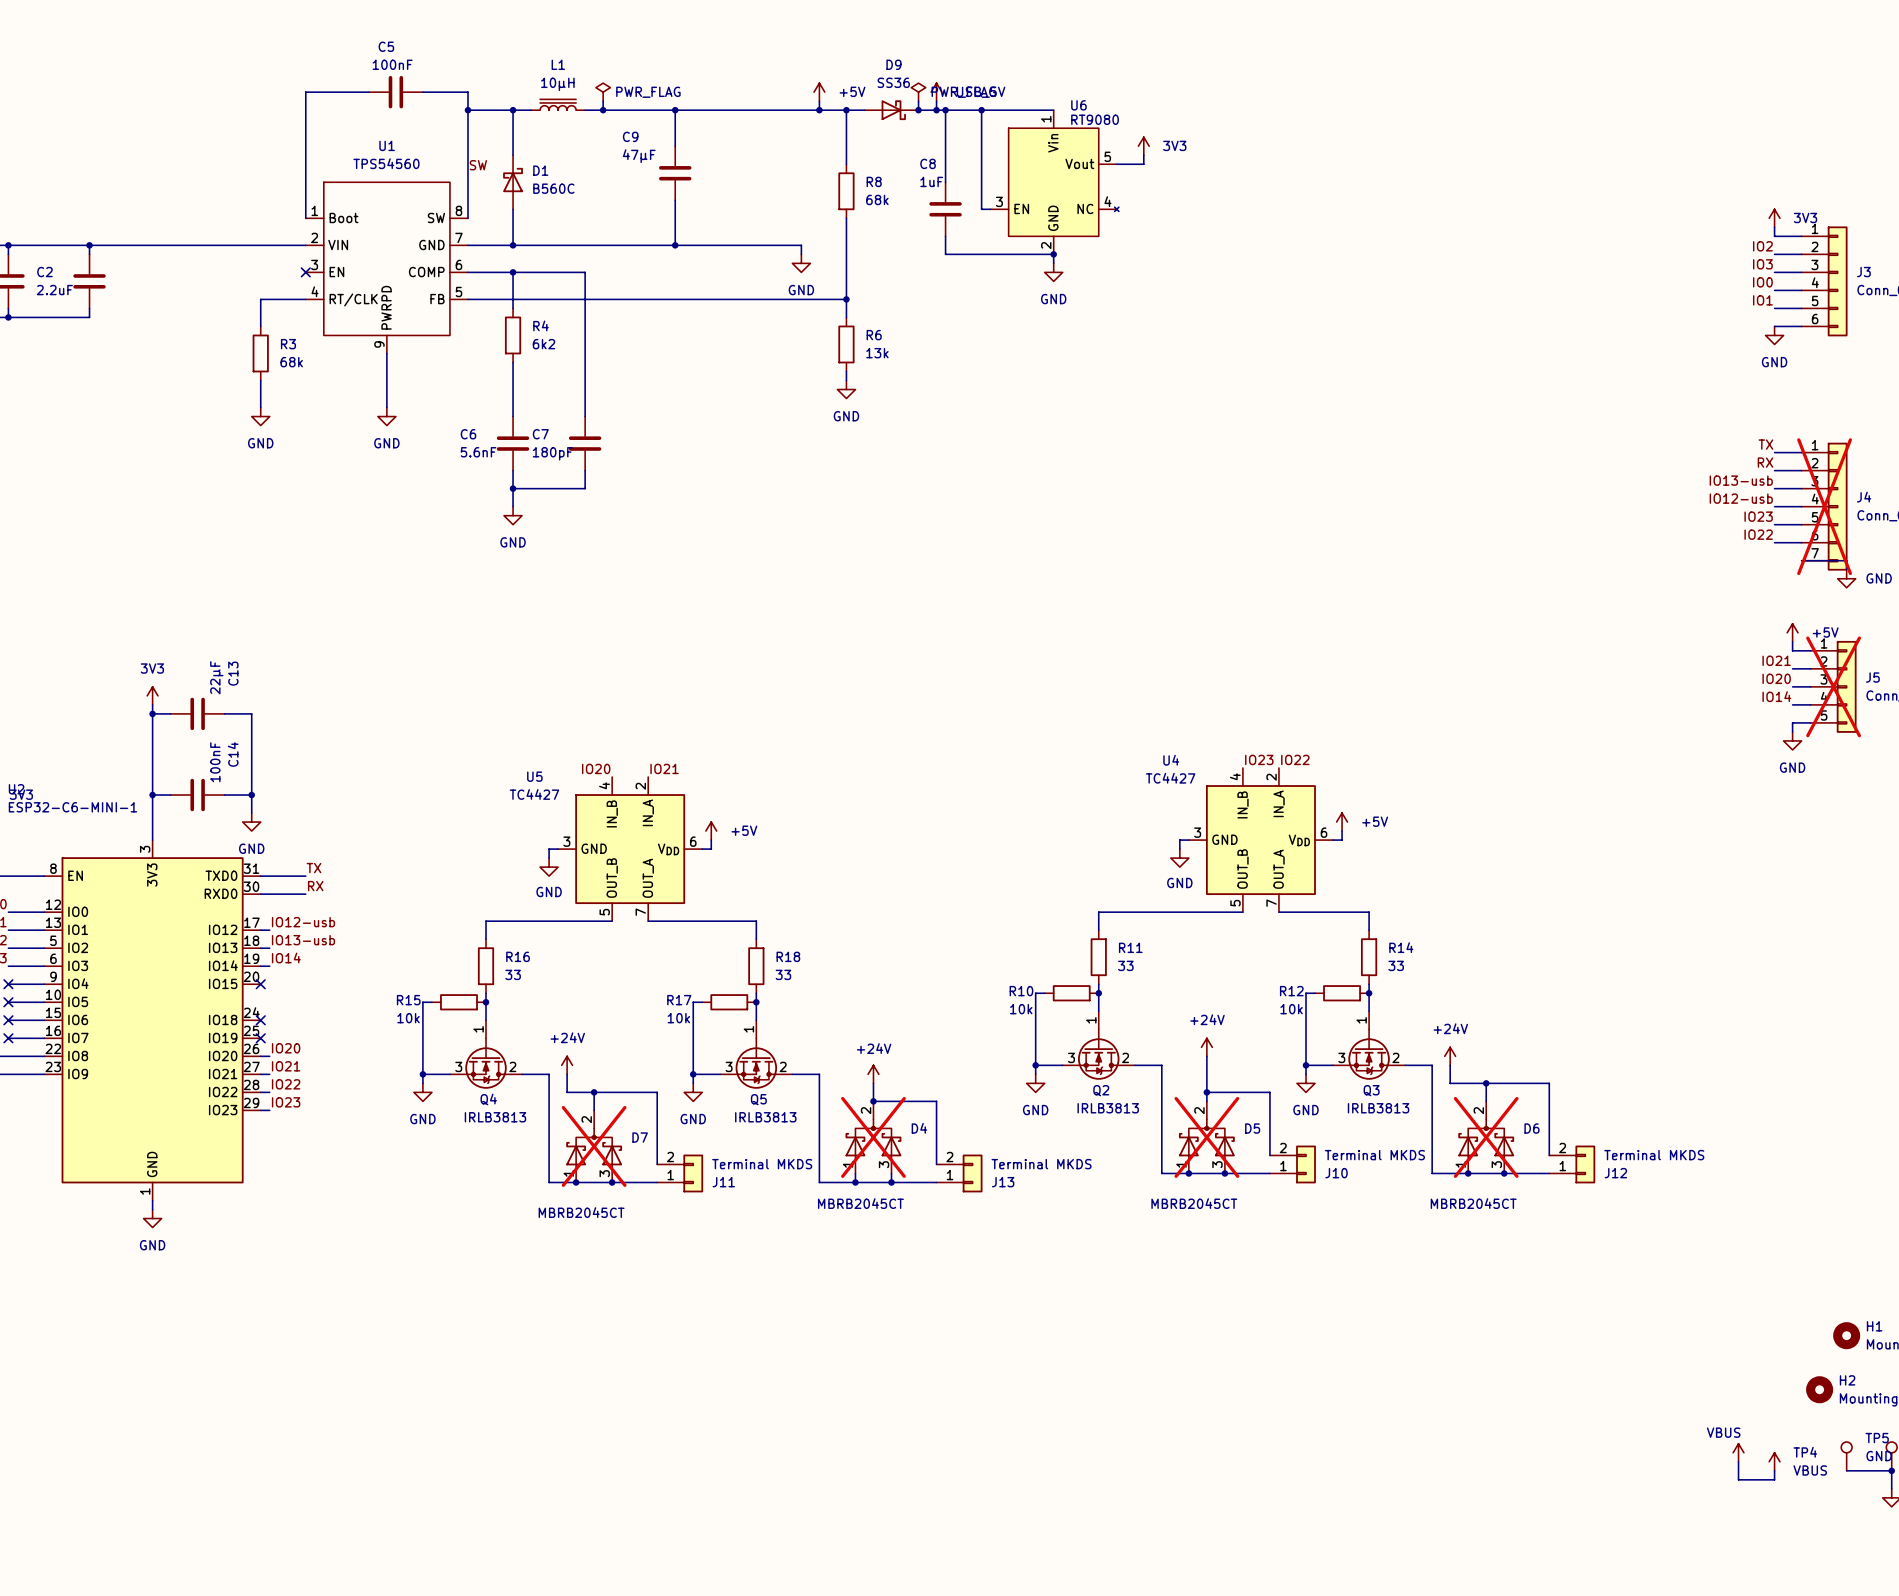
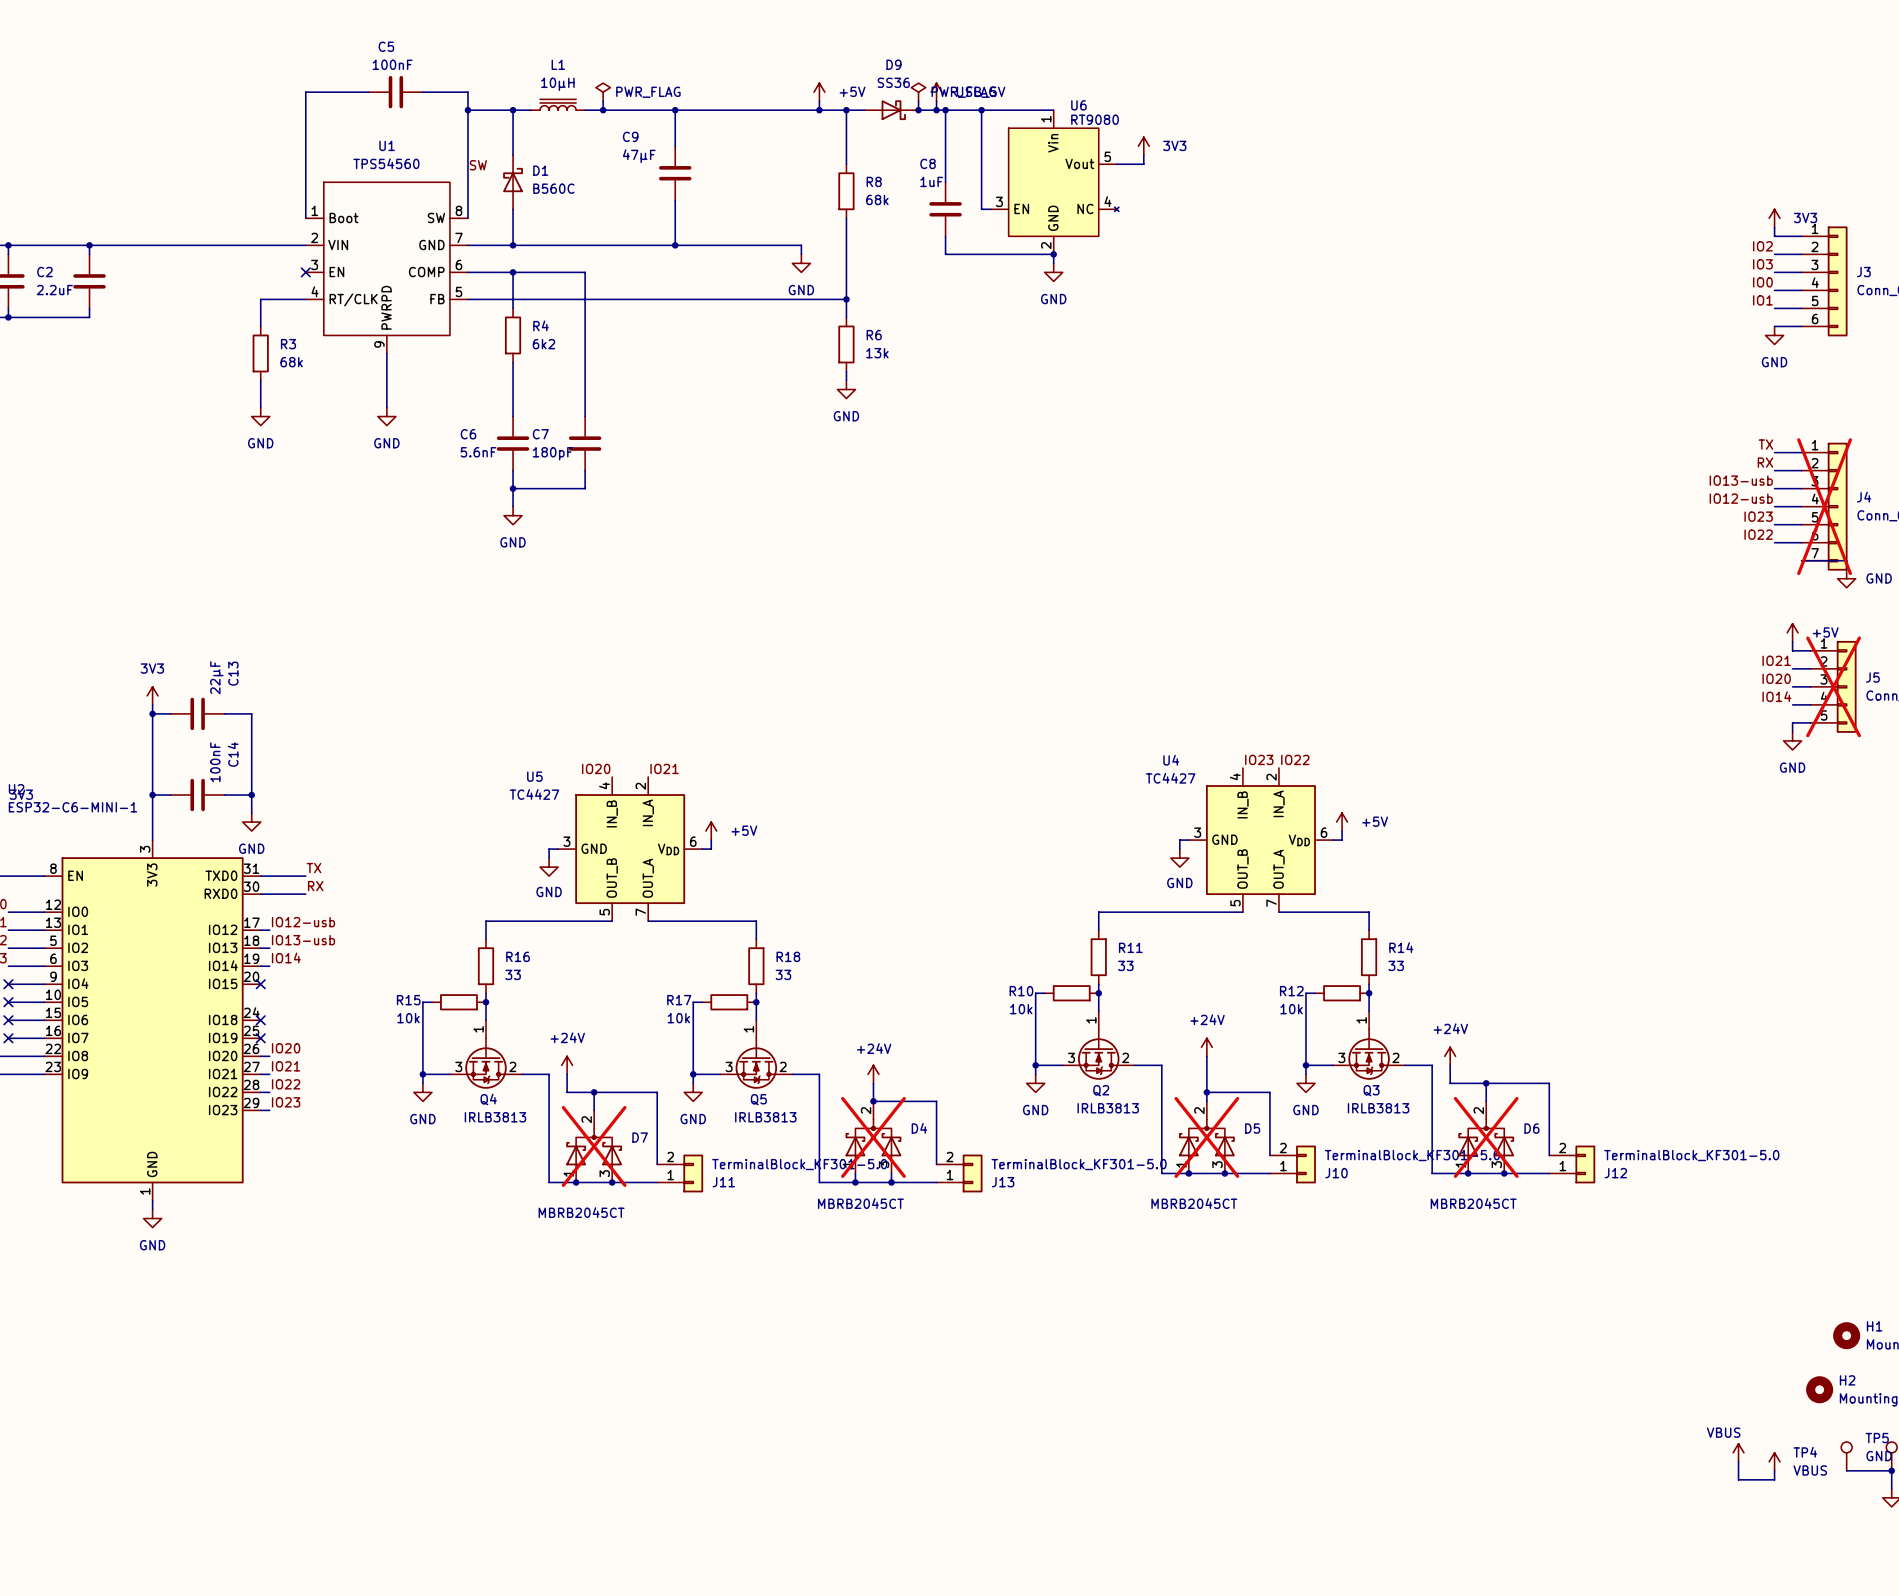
J10 value: Terminal MKDS (1374, 1155) -> TerminalBlock_KF301-5.0 (1412, 1155)
J12 value: Terminal MKDS (1654, 1155) -> TerminalBlock_KF301-5.0 (1691, 1155)
J11 value: Terminal MKDS (762, 1164) -> TerminalBlock_KF301-5.0 (799, 1164)
J13 value: Terminal MKDS (1041, 1164) -> TerminalBlock_KF301-5.0 (1079, 1164)

